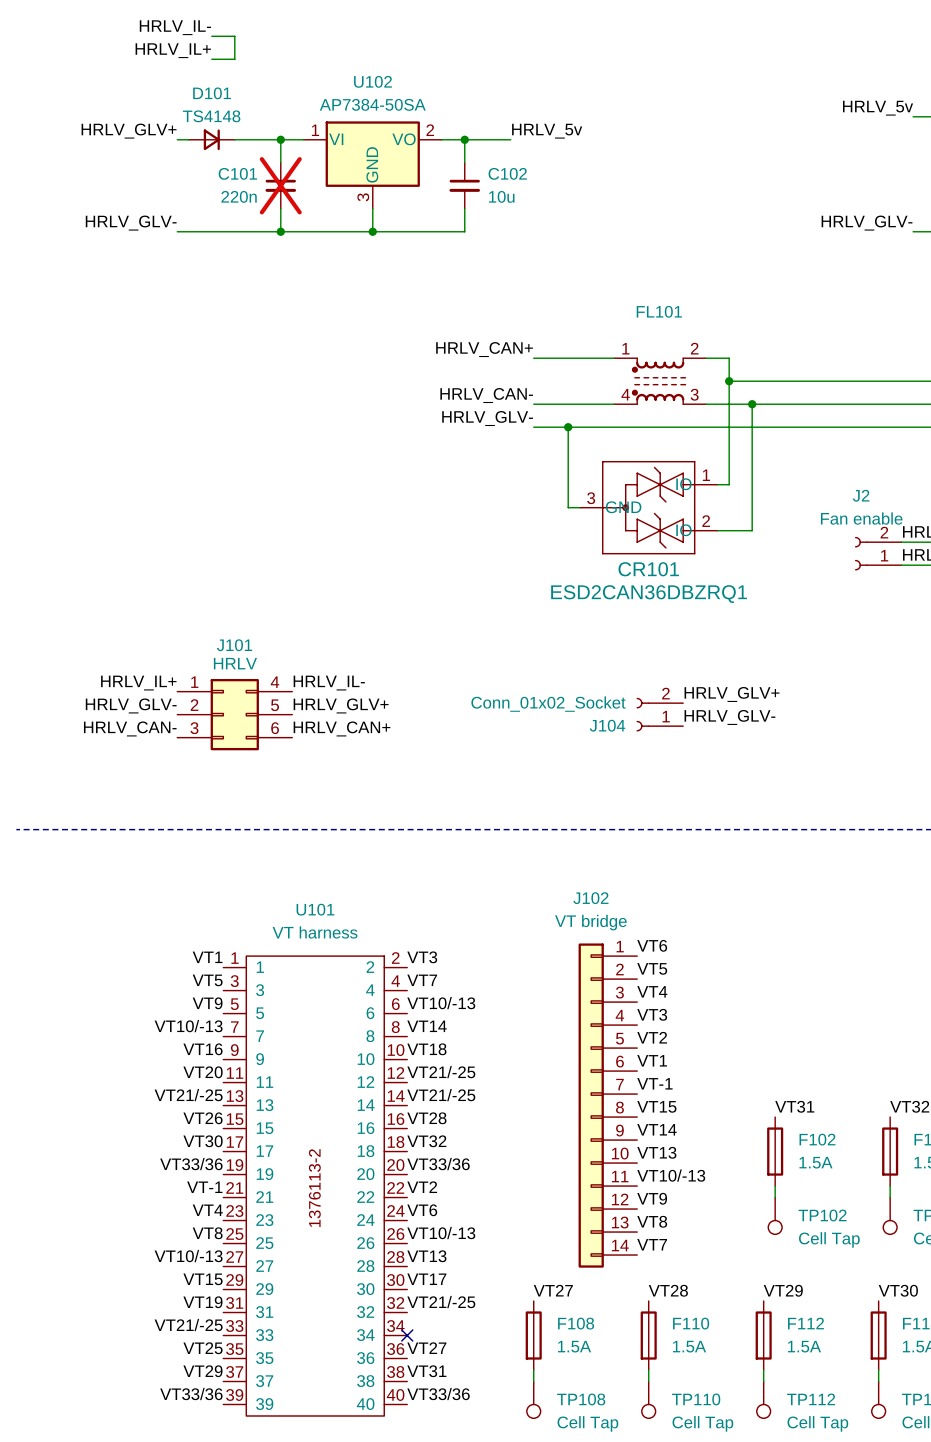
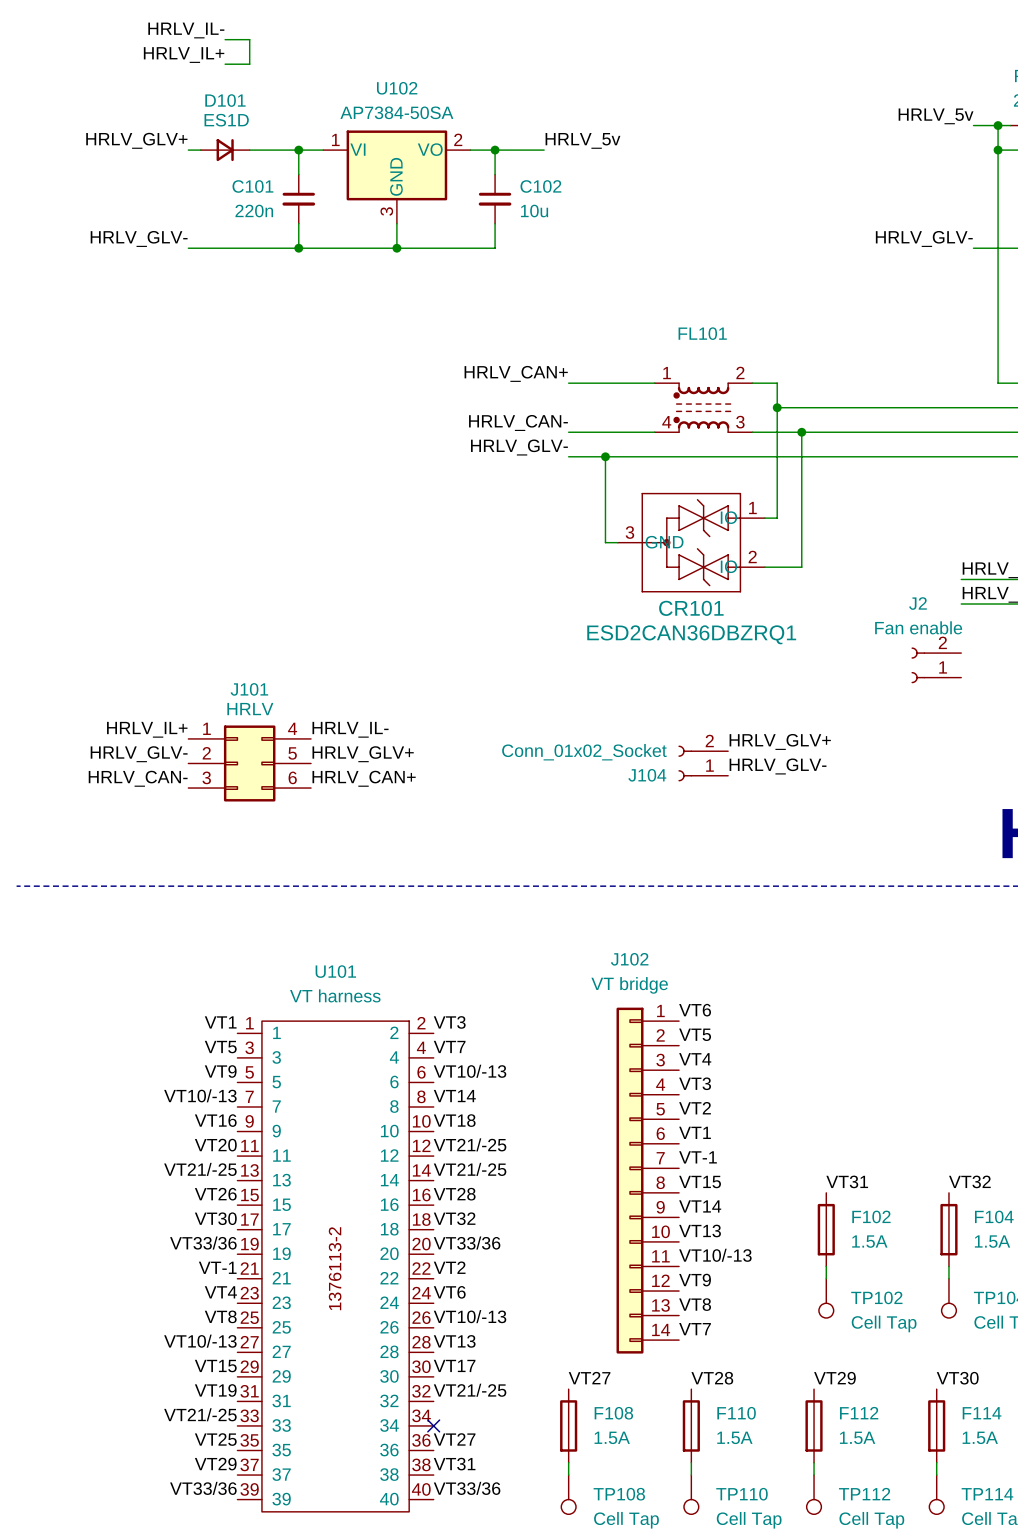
D101 value: TS4148 (211, 116) -> ES1D (226, 120)
C101 do-not-place cross: (280, 185) -> none
J2 position: (878, 553) -> (936, 665)

